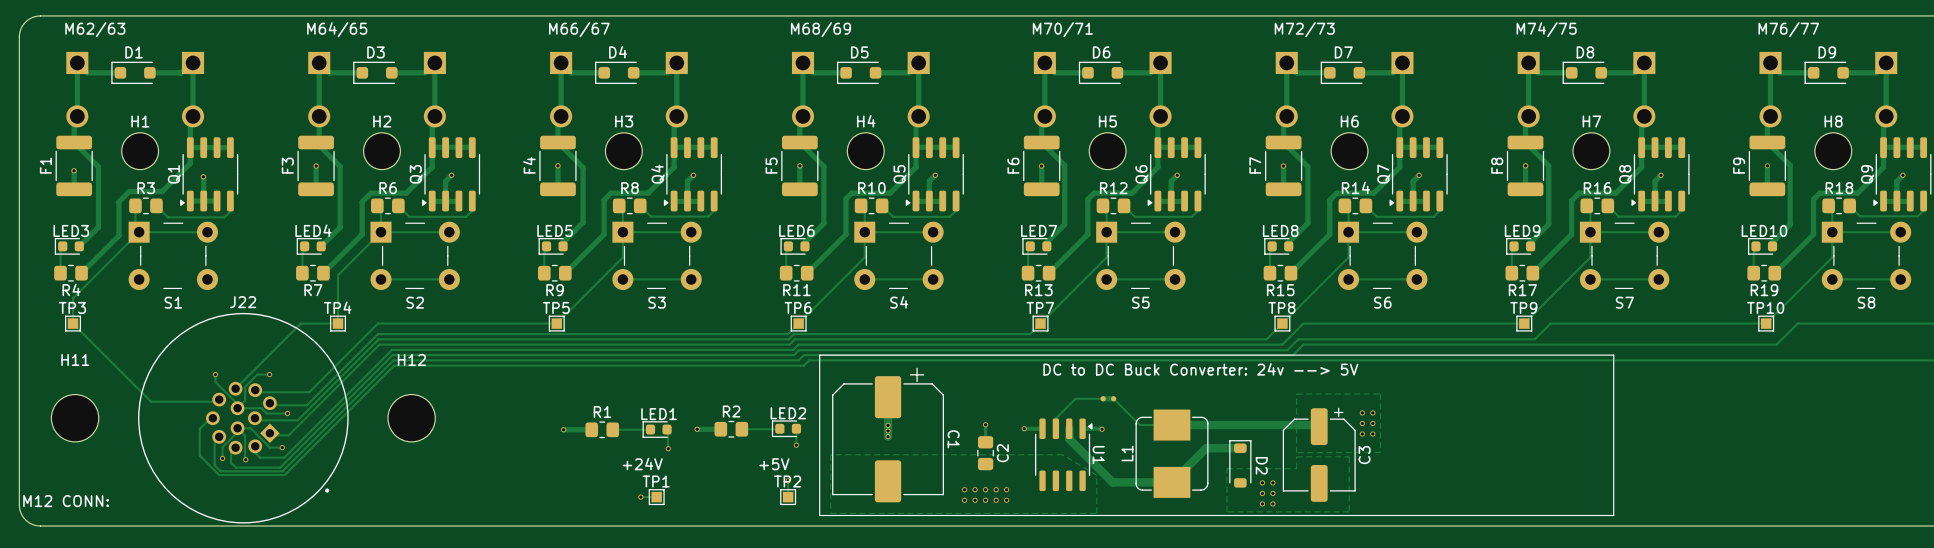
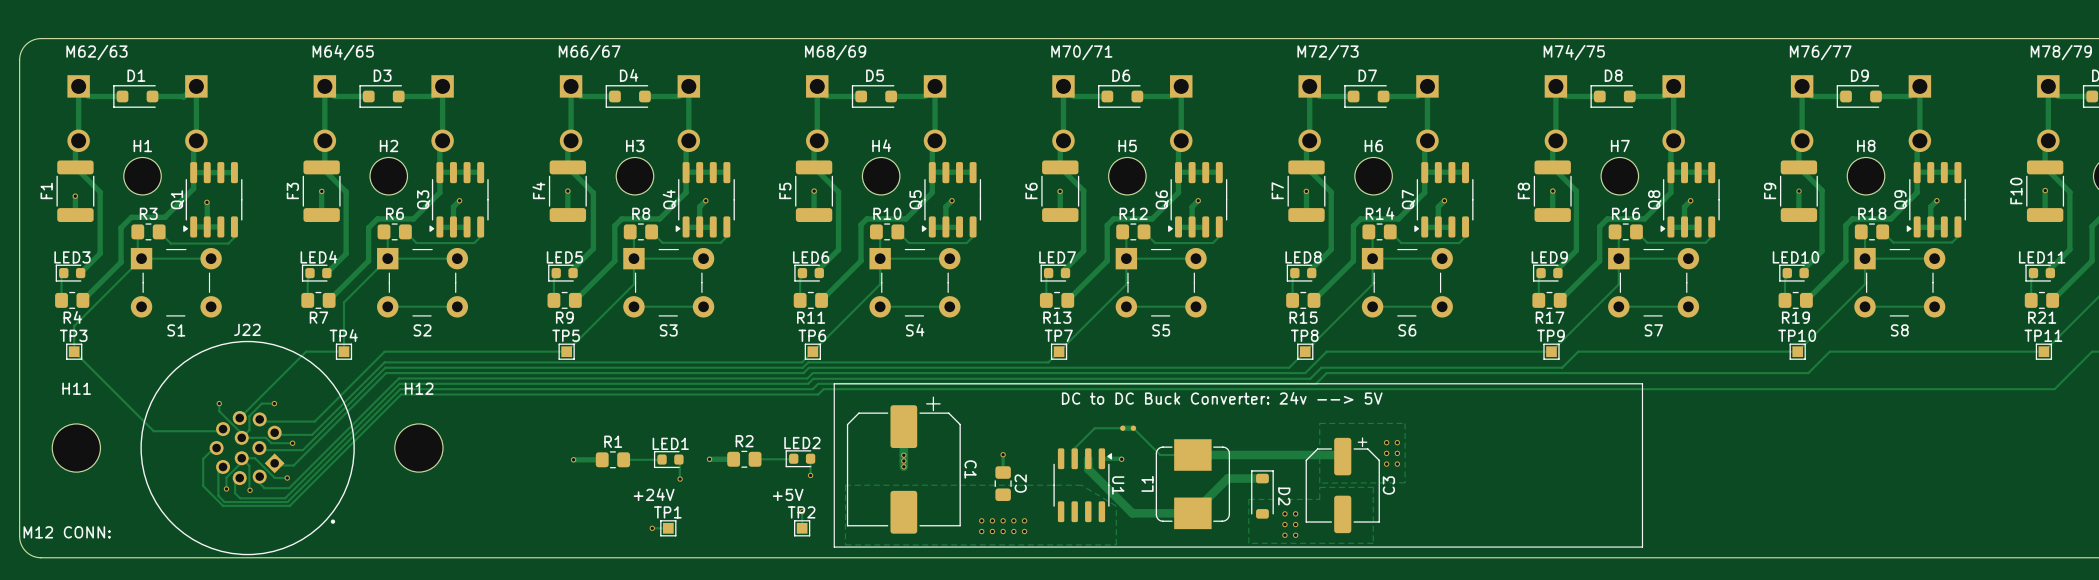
track: (1024, 428) (1042, 428) -> none
via: (1024, 428) -> none

